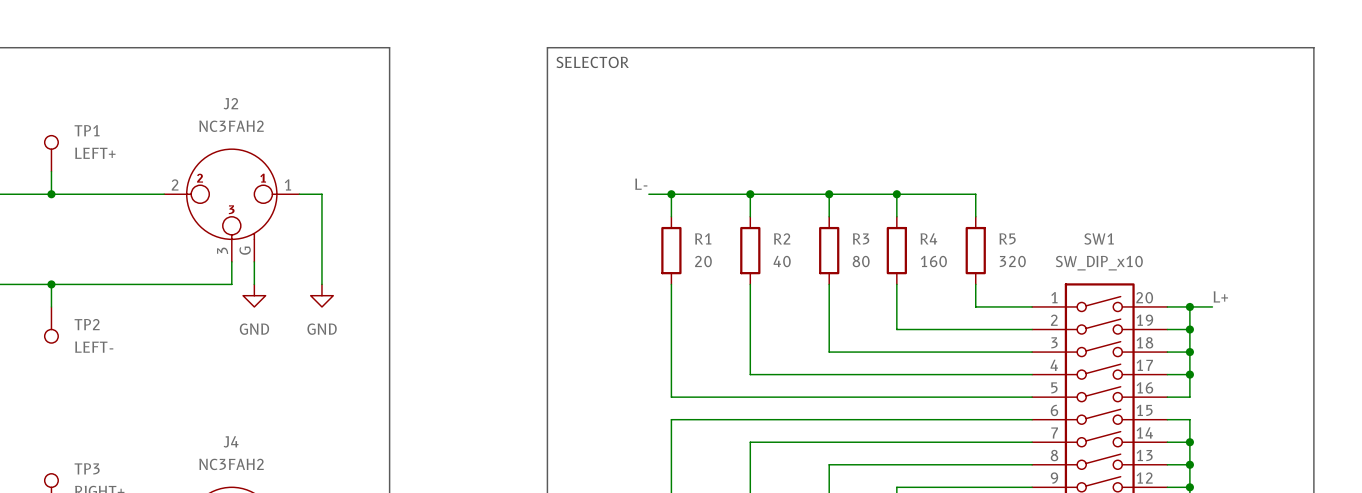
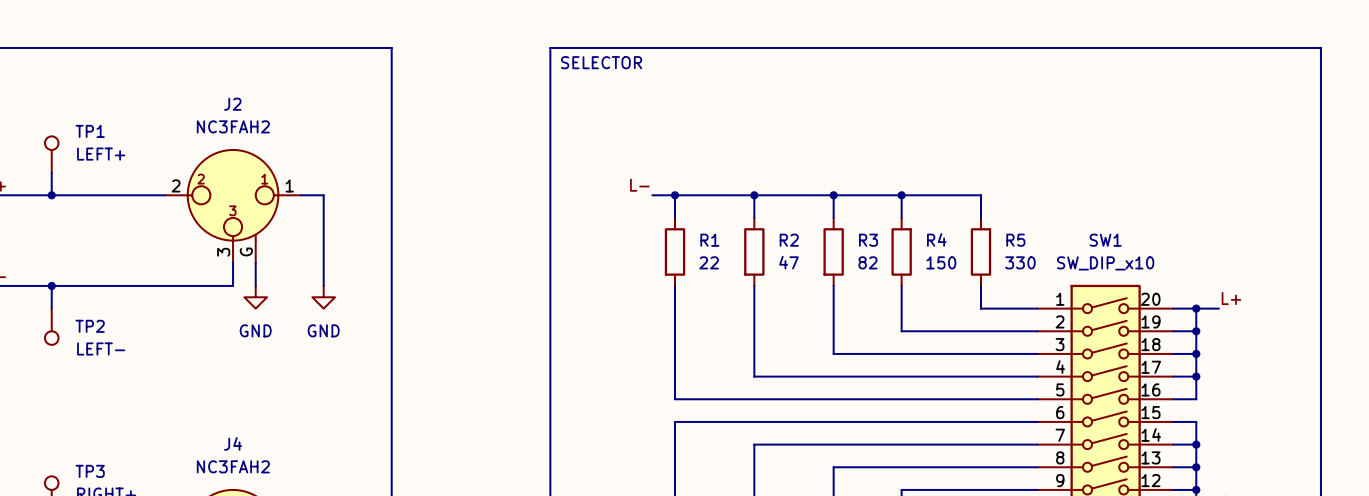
R1 value: 20 (703, 261) -> 22 (709, 262)
R2 value: 40 (782, 261) -> 47 (788, 262)
R3 value: 80 (861, 261) -> 82 (868, 262)
R4 value: 160 (933, 261) -> 150 (941, 262)
R5 value: 320 (1012, 261) -> 330 (1020, 262)

